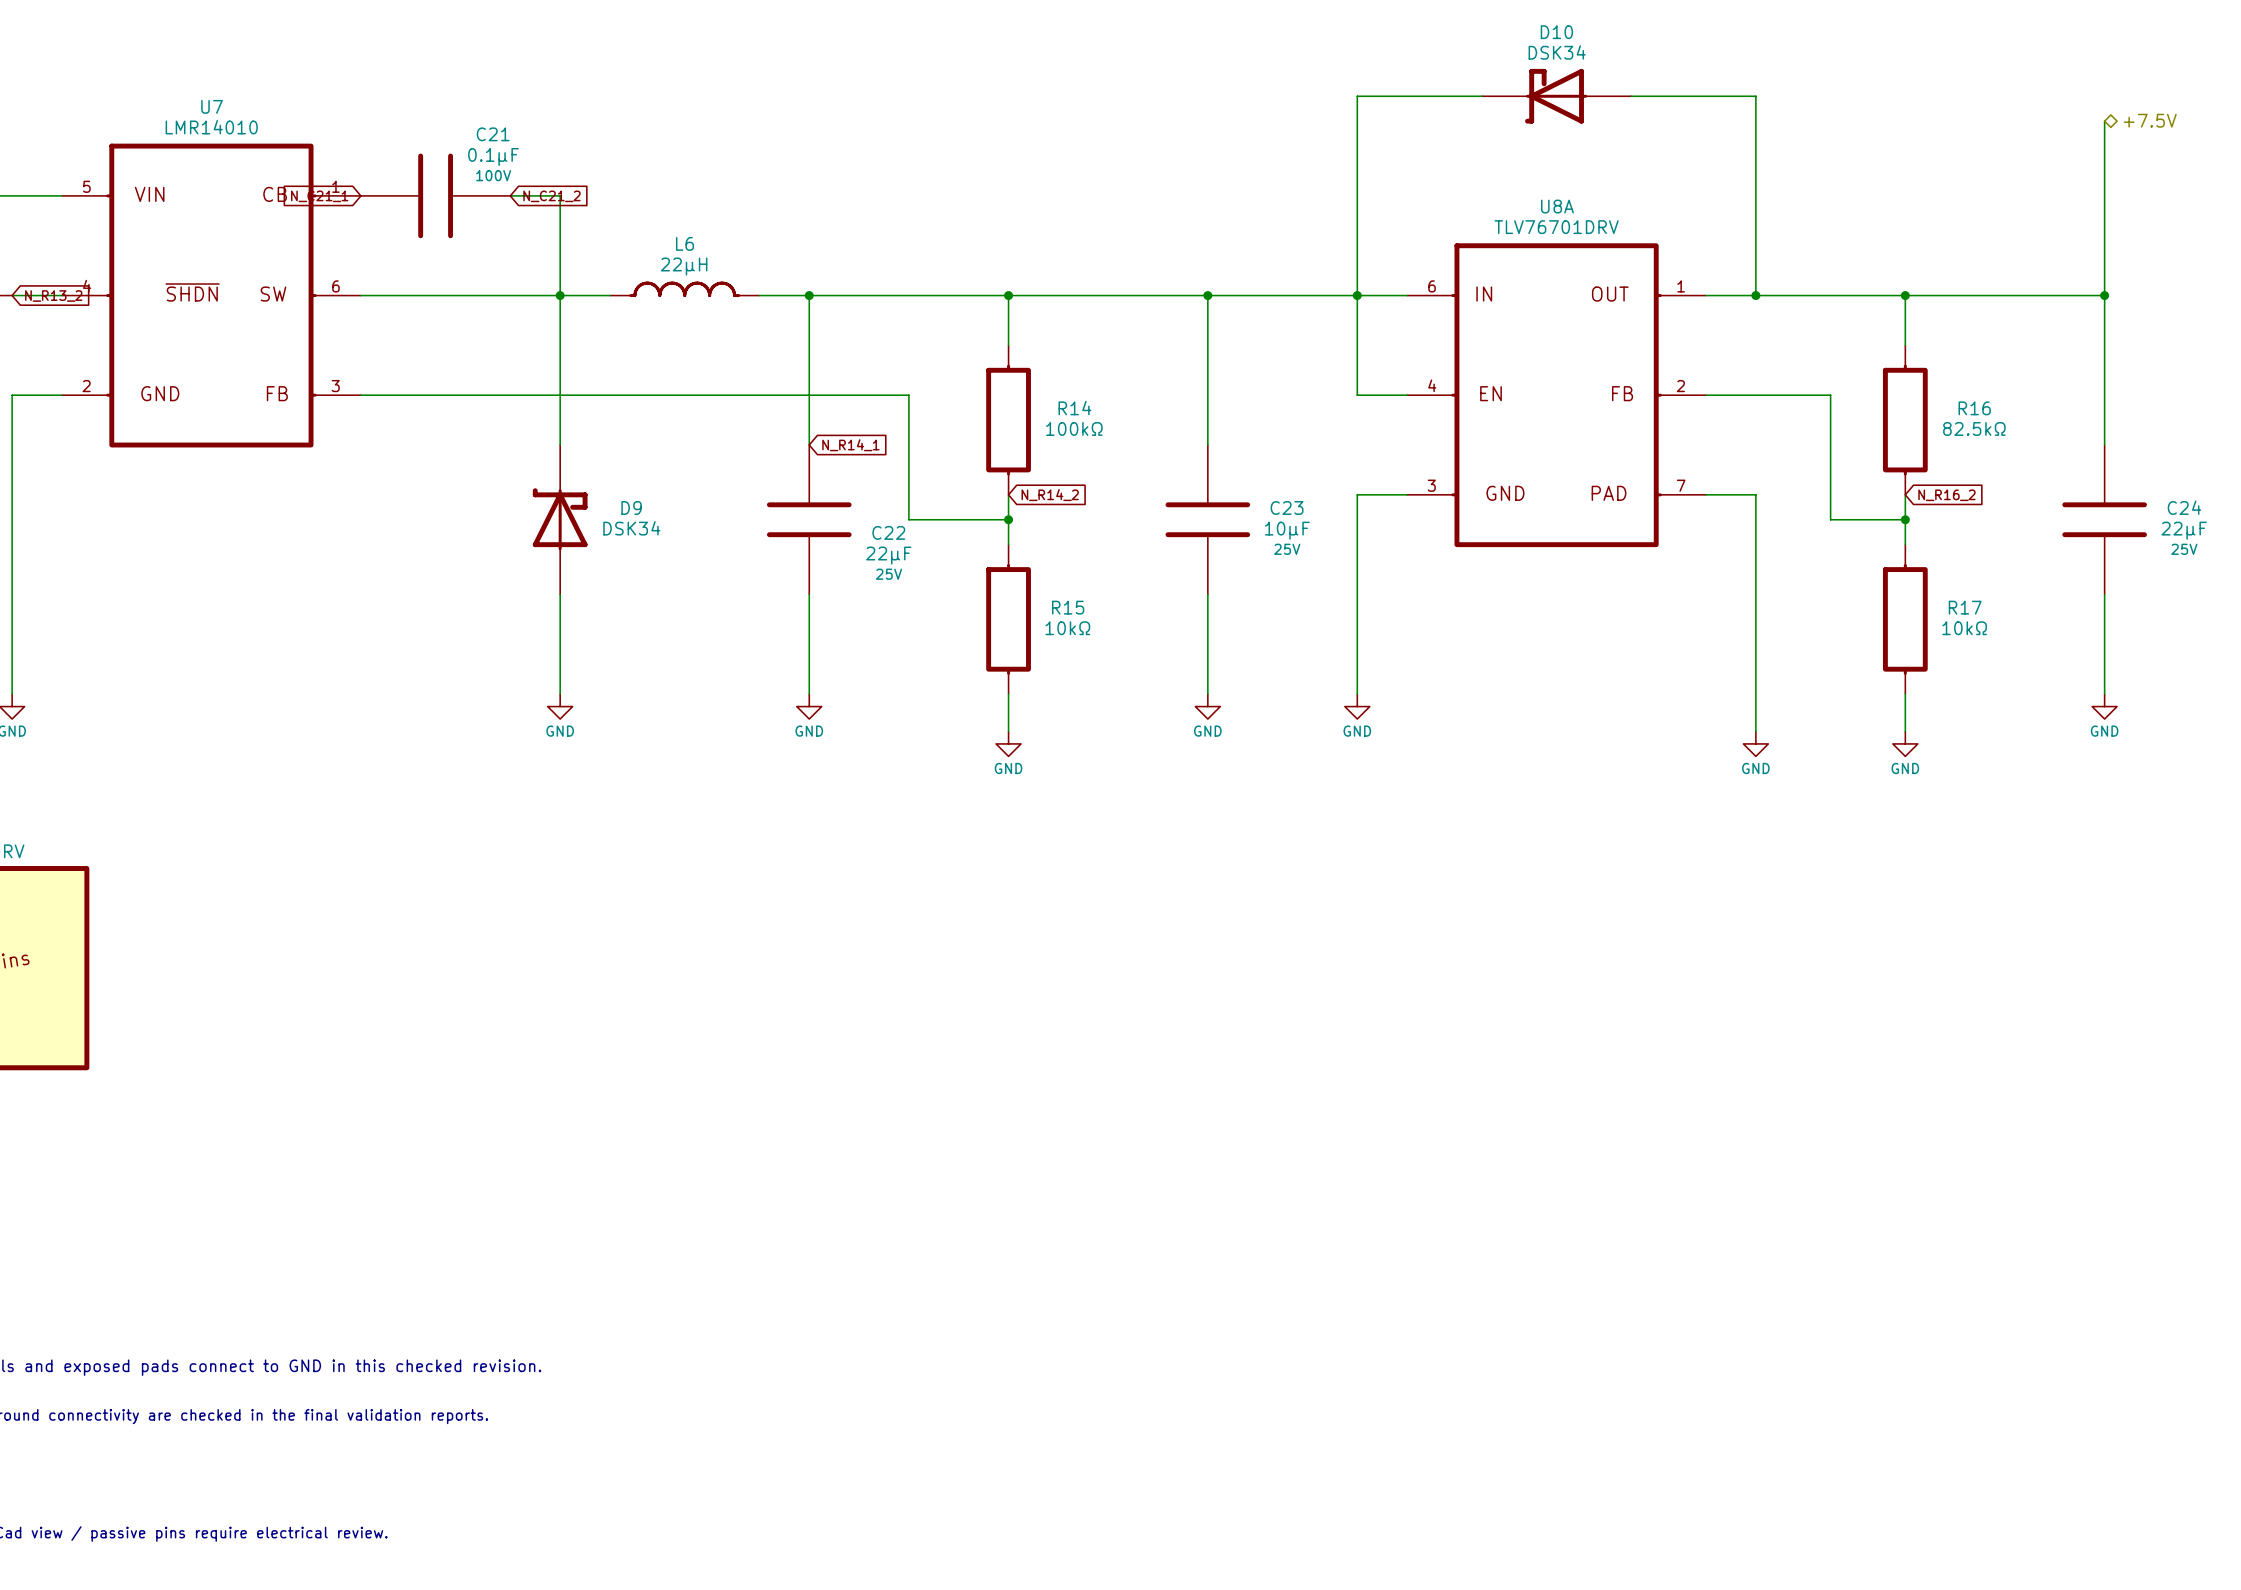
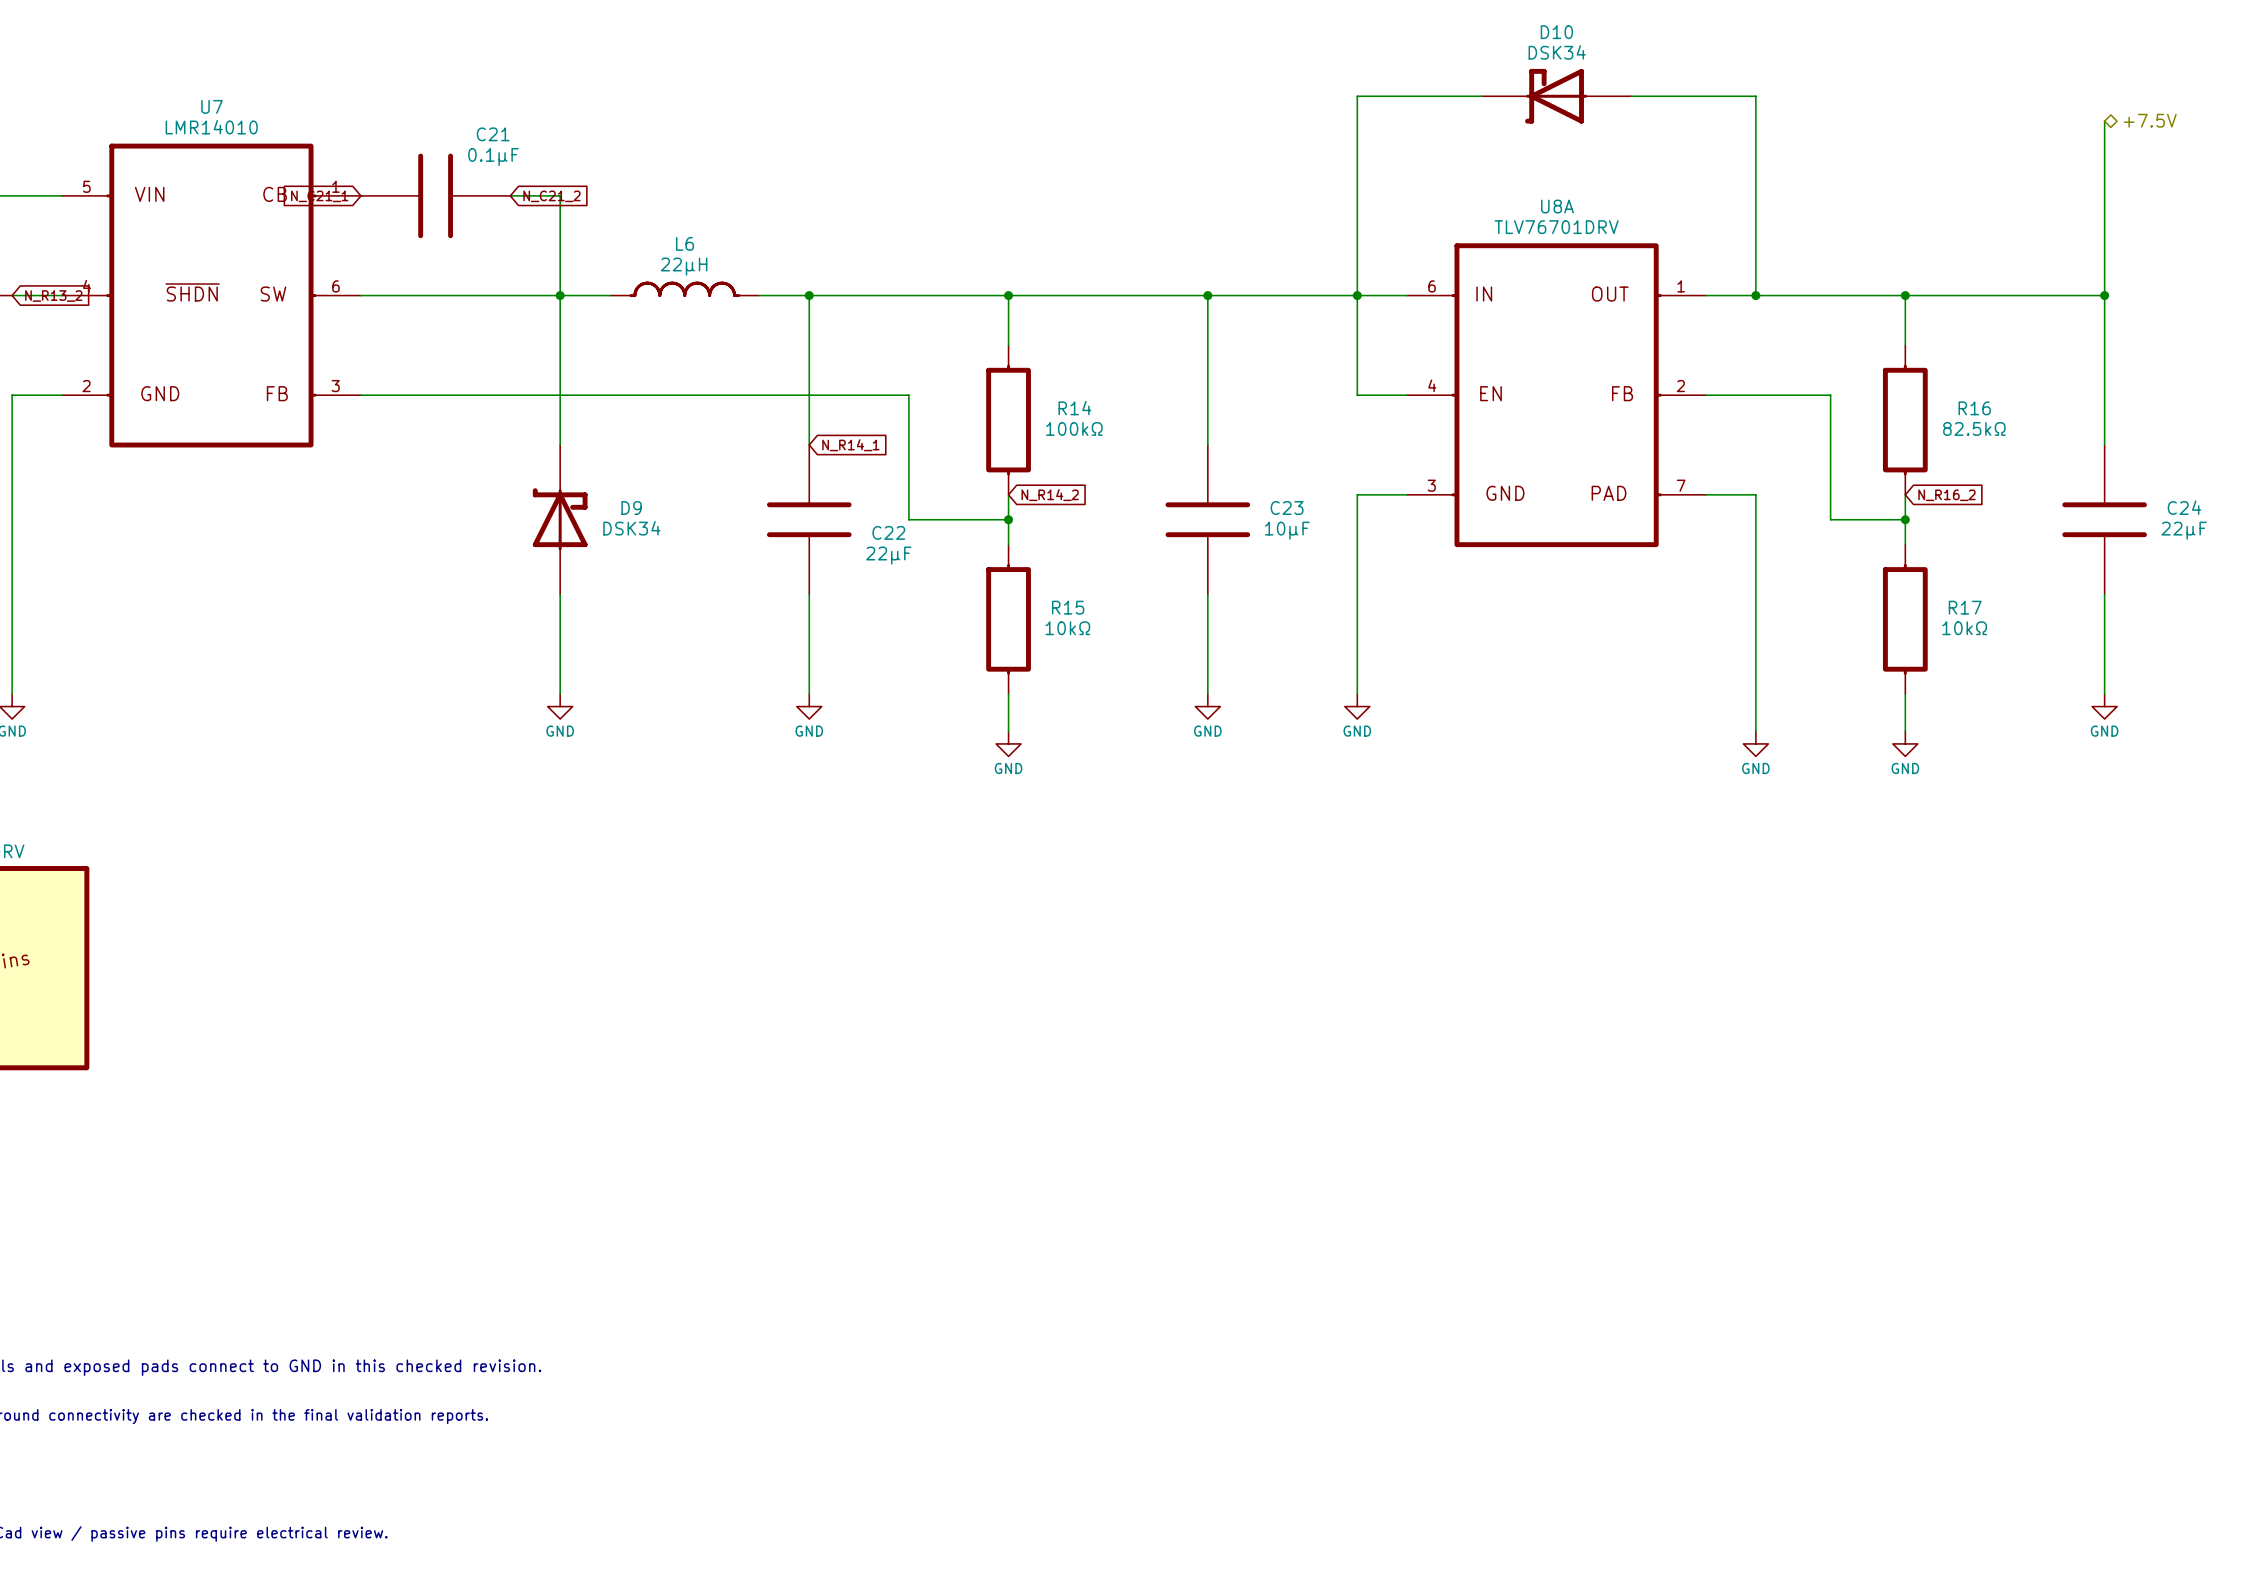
C21 text: 100V (493, 175) -> none
C23 text: 25V (1287, 549) -> none
C24 text: 25V (2184, 549) -> none
C22 text: 25V (889, 574) -> none

